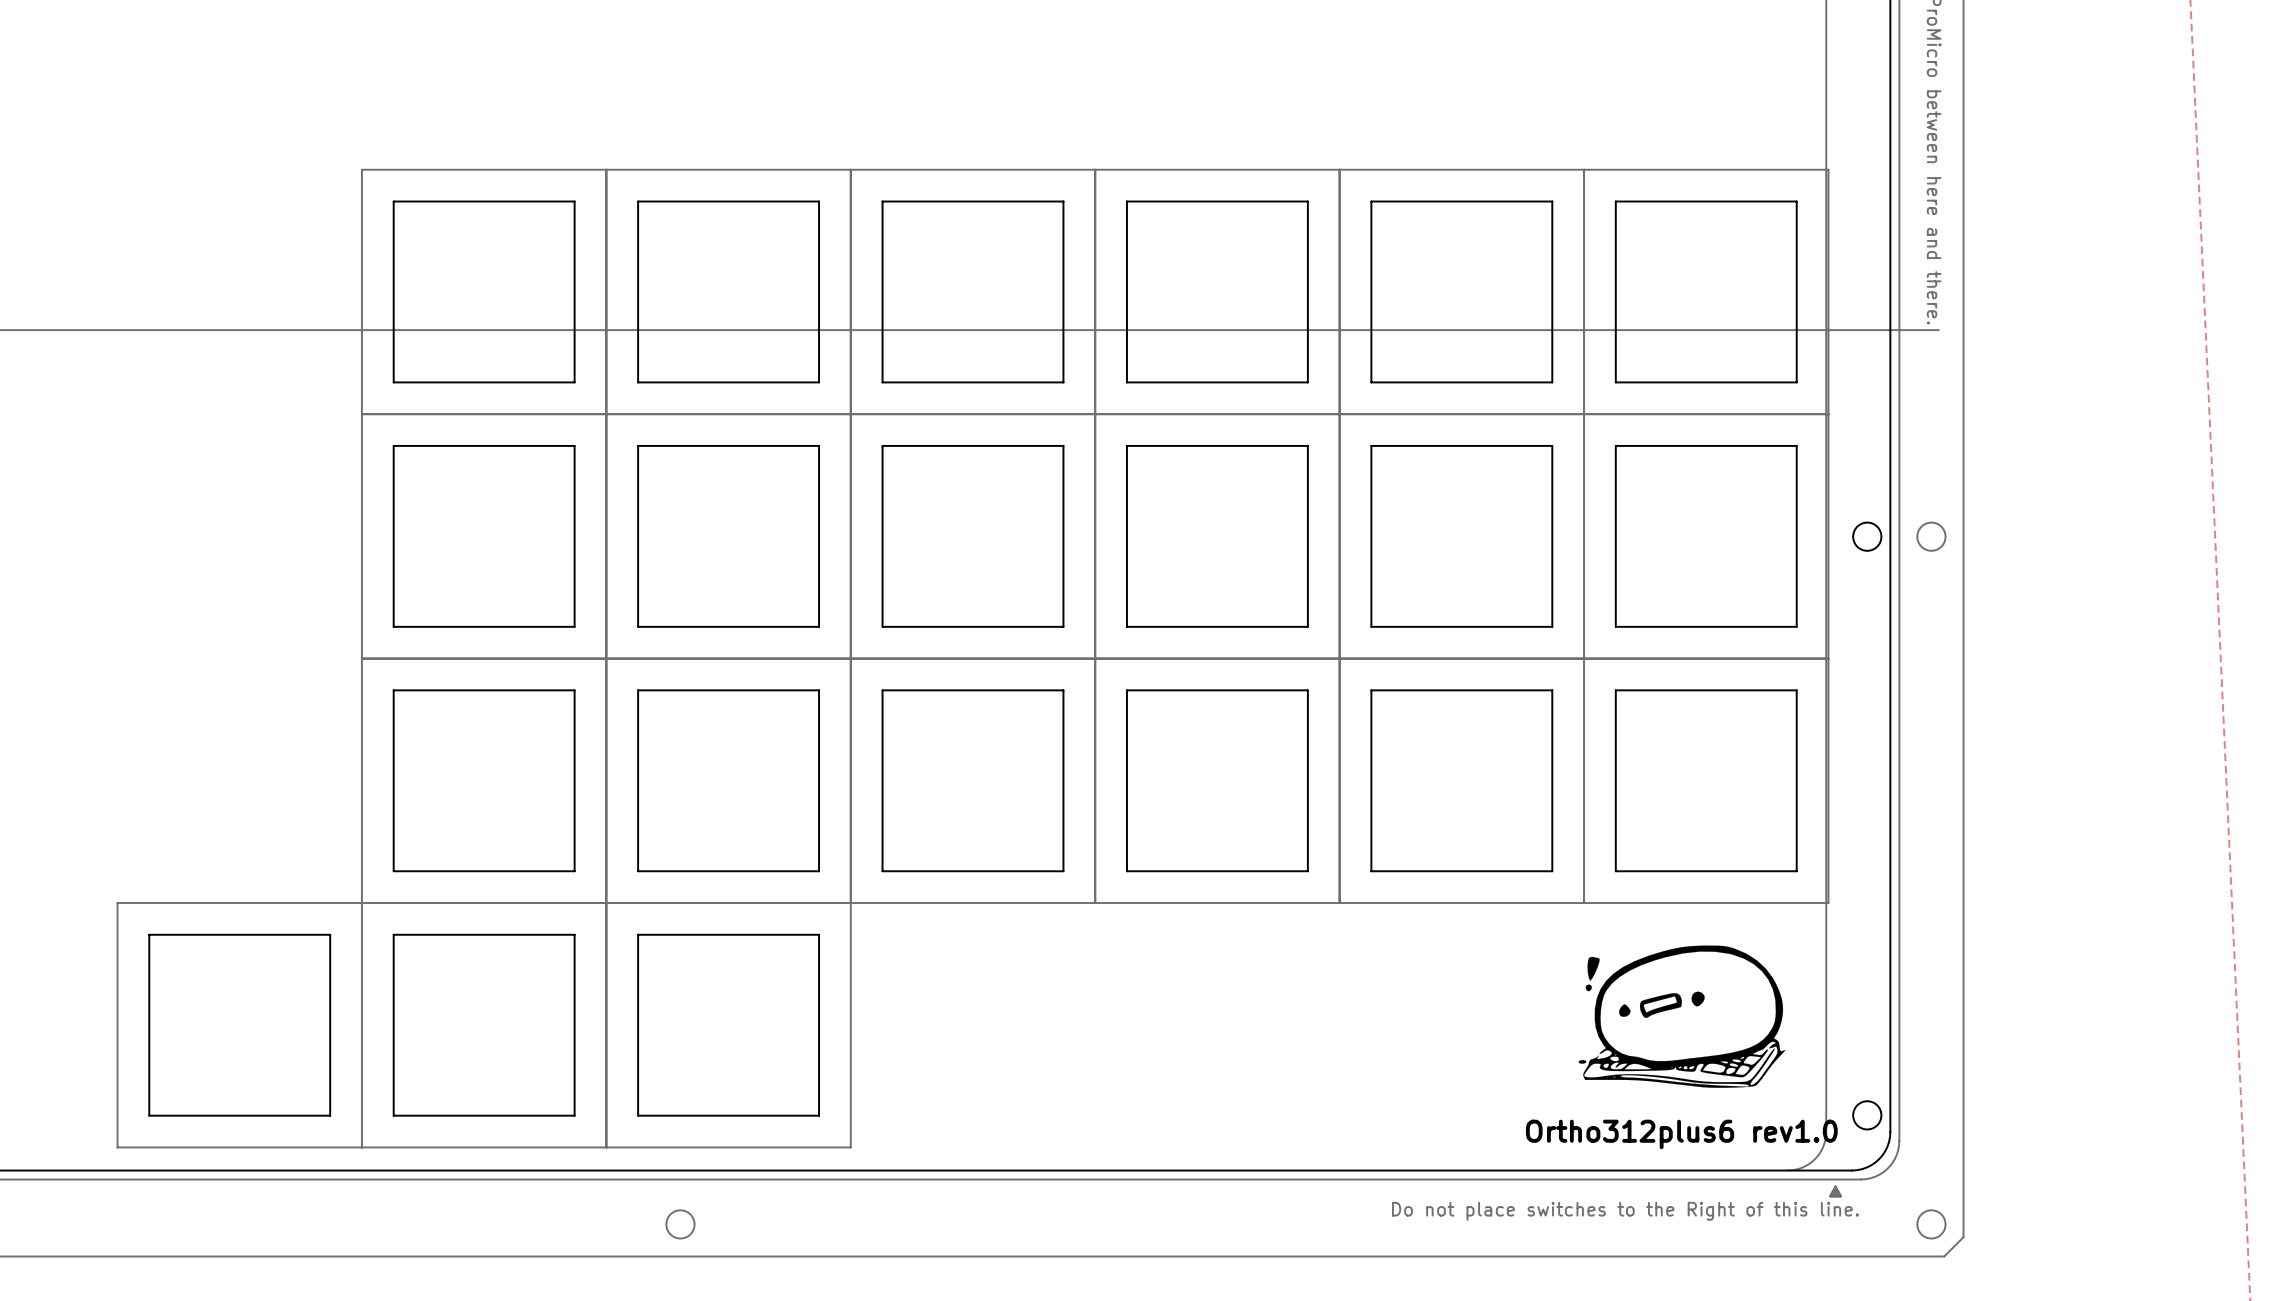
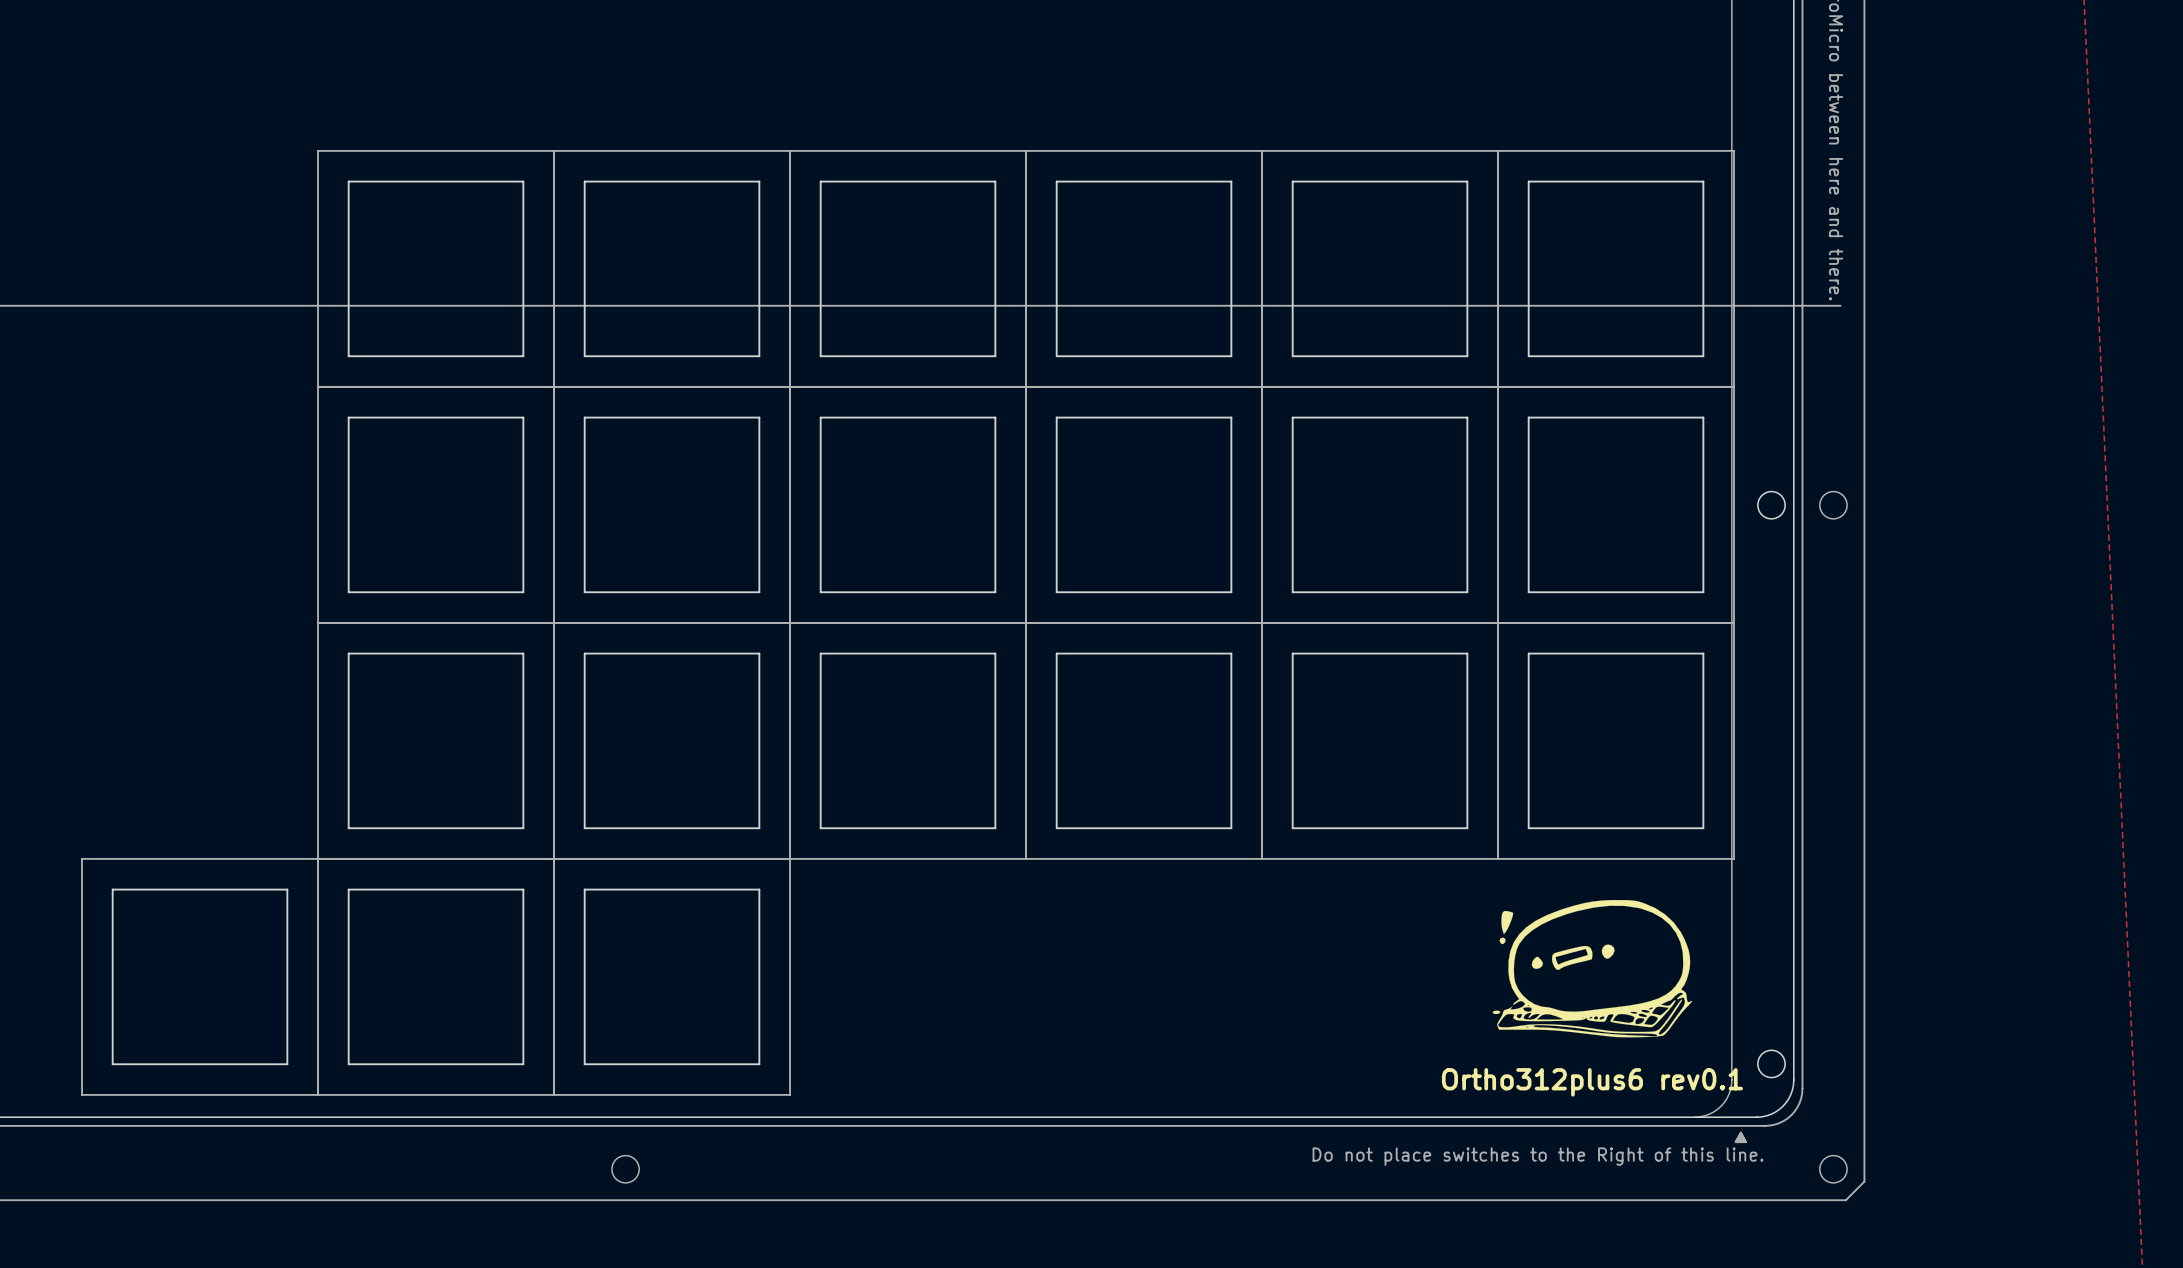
text: Ortho312plus6 rev1.0 (1681, 1134) -> Ortho312plus6 rev0.1 (1592, 1082)

